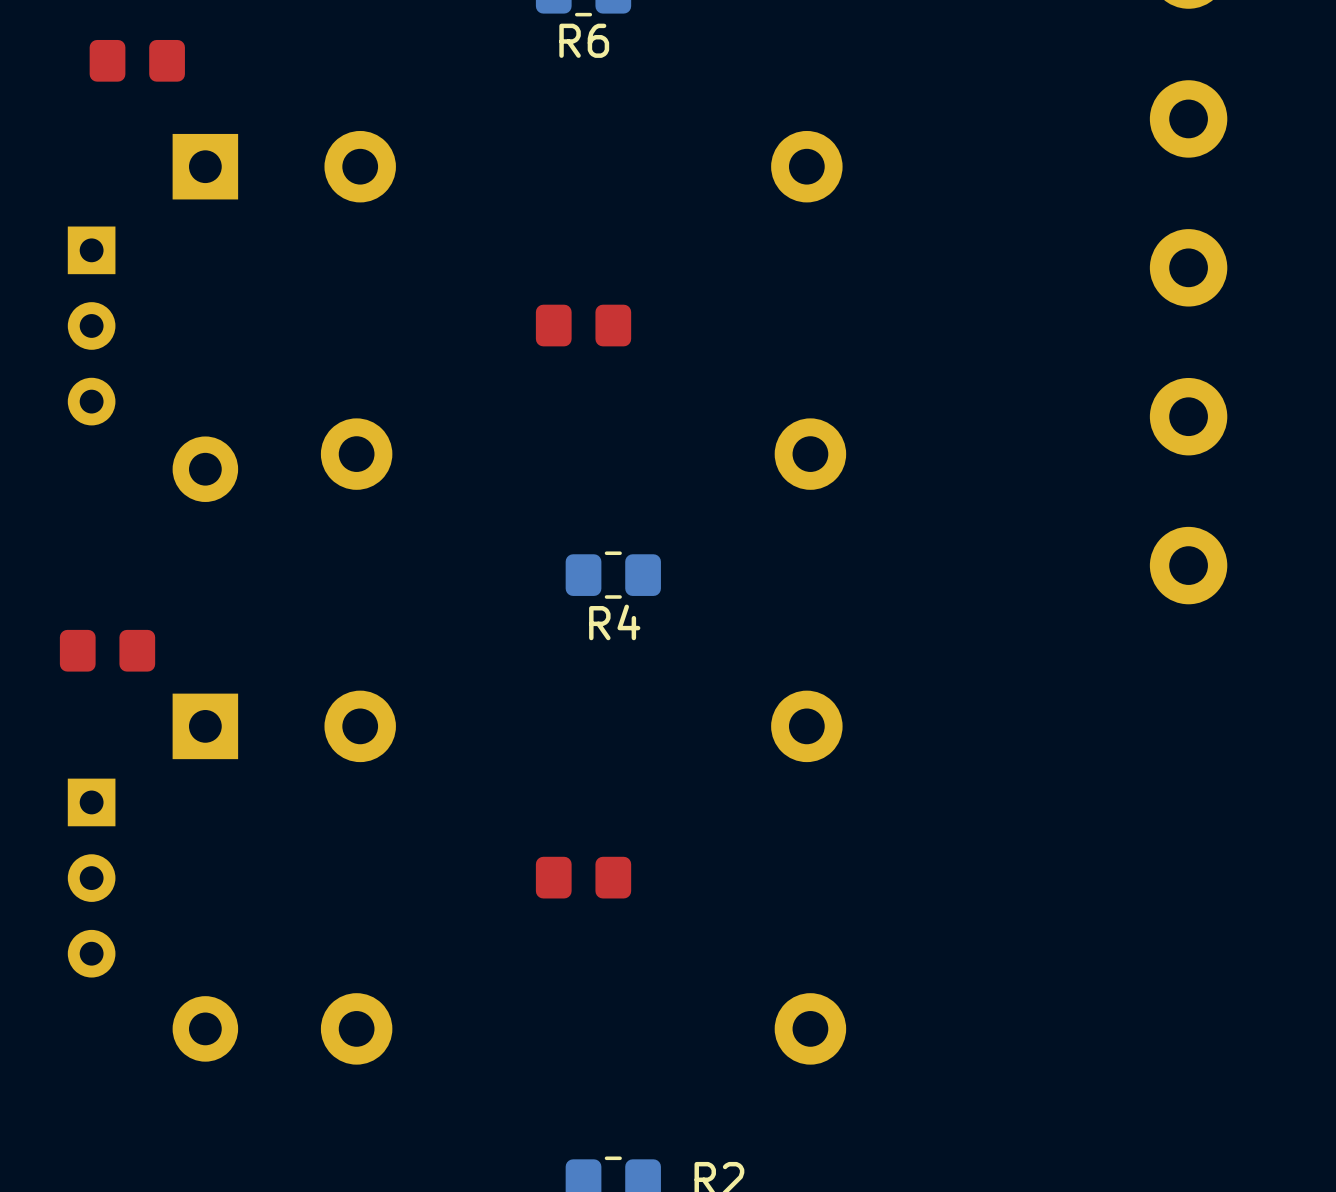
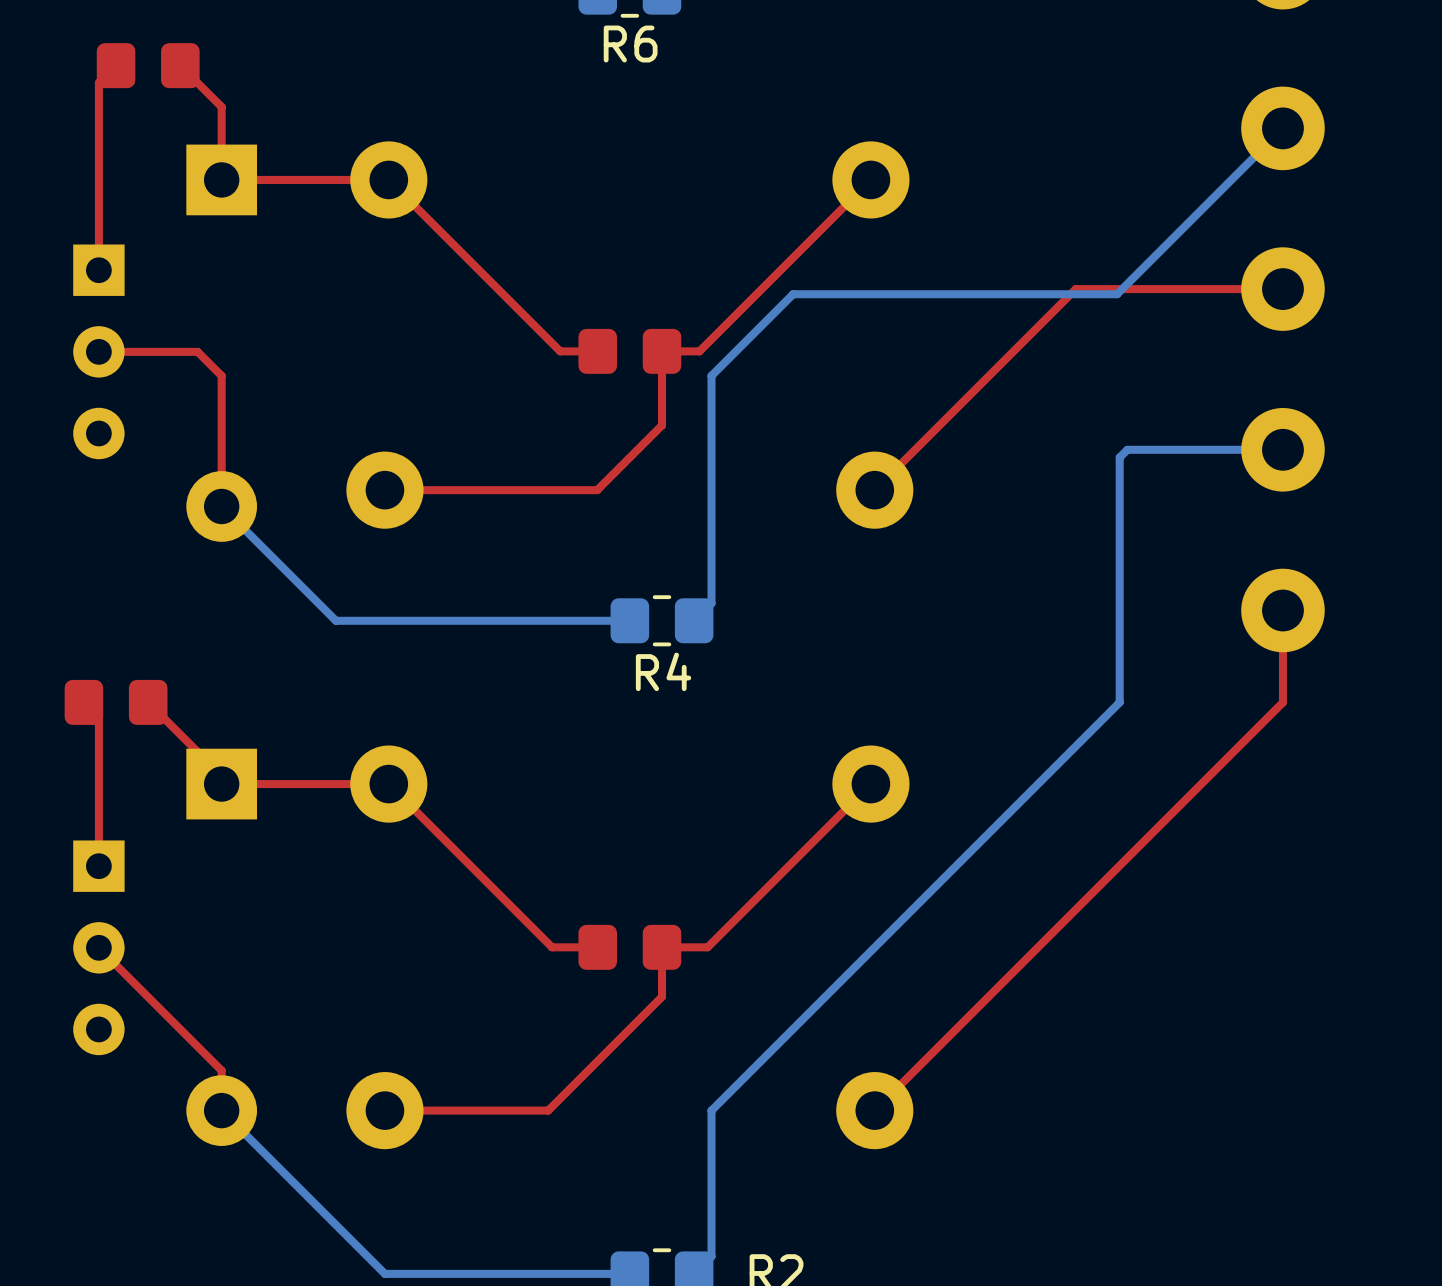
top track: none -> (116, 65) (98, 82) (98, 270)
top track: none -> (180, 65) (221, 106) (221, 179) (388, 179) (560, 351) (597, 351)
bottom track: none -> (1282, 128) (1117, 294) (793, 294) (711, 375) (711, 603) (694, 620)
top track: none -> (870, 179) (699, 351) (662, 351) (662, 425) (597, 490) (384, 490)
top track: none -> (1282, 289) (1075, 289) (874, 490)
top track: none -> (98, 351) (197, 351) (221, 375) (221, 506)
bottom track: none -> (1282, 449) (1127, 449) (1119, 457) (1119, 702) (711, 1110) (711, 1256) (694, 1273)
bottom track: none -> (221, 506) (335, 620) (629, 620)
top track: none -> (1282, 610) (1282, 702) (874, 1110)
top track: none -> (83, 702) (98, 717) (98, 866)
top track: none -> (148, 702) (221, 775) (221, 784) (388, 784) (552, 947) (597, 947)
top track: none -> (870, 784) (707, 947) (662, 947) (662, 996) (548, 1110) (384, 1110)
top track: none -> (98, 947) (221, 1070) (221, 1110)
bottom track: none -> (221, 1110) (384, 1273) (629, 1273)

